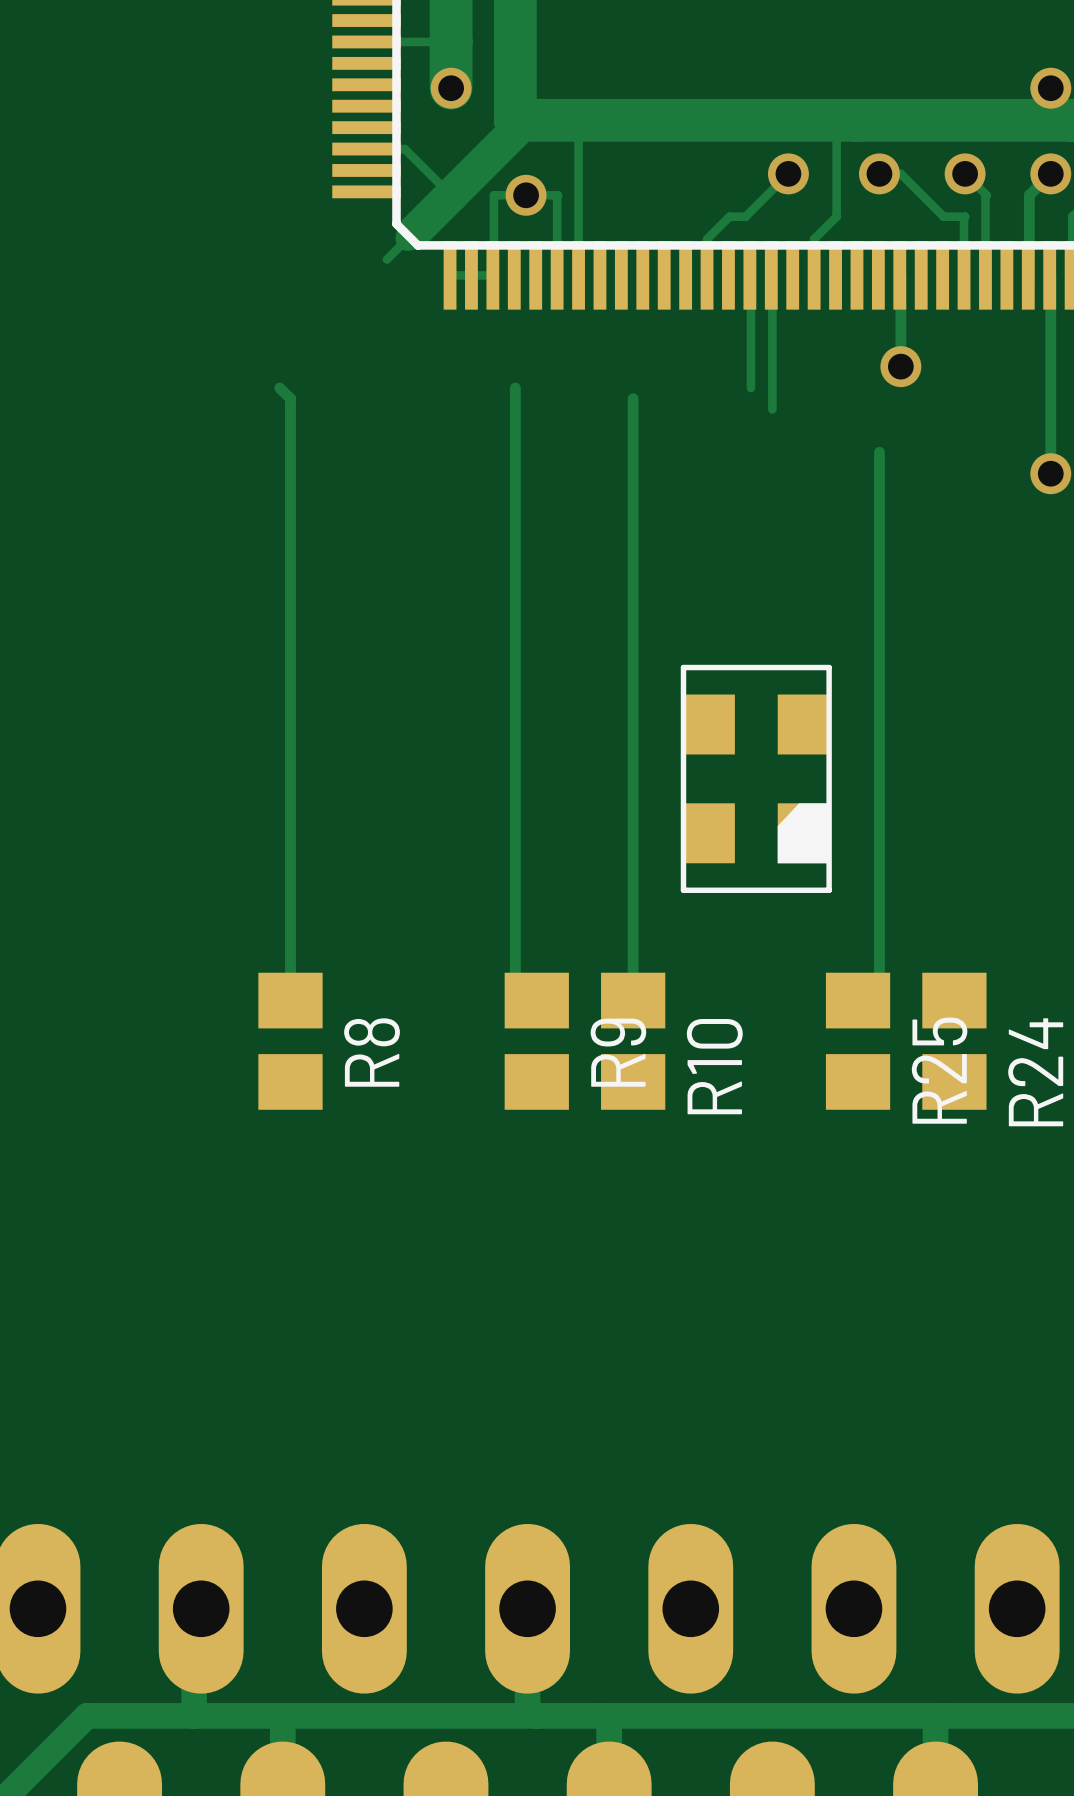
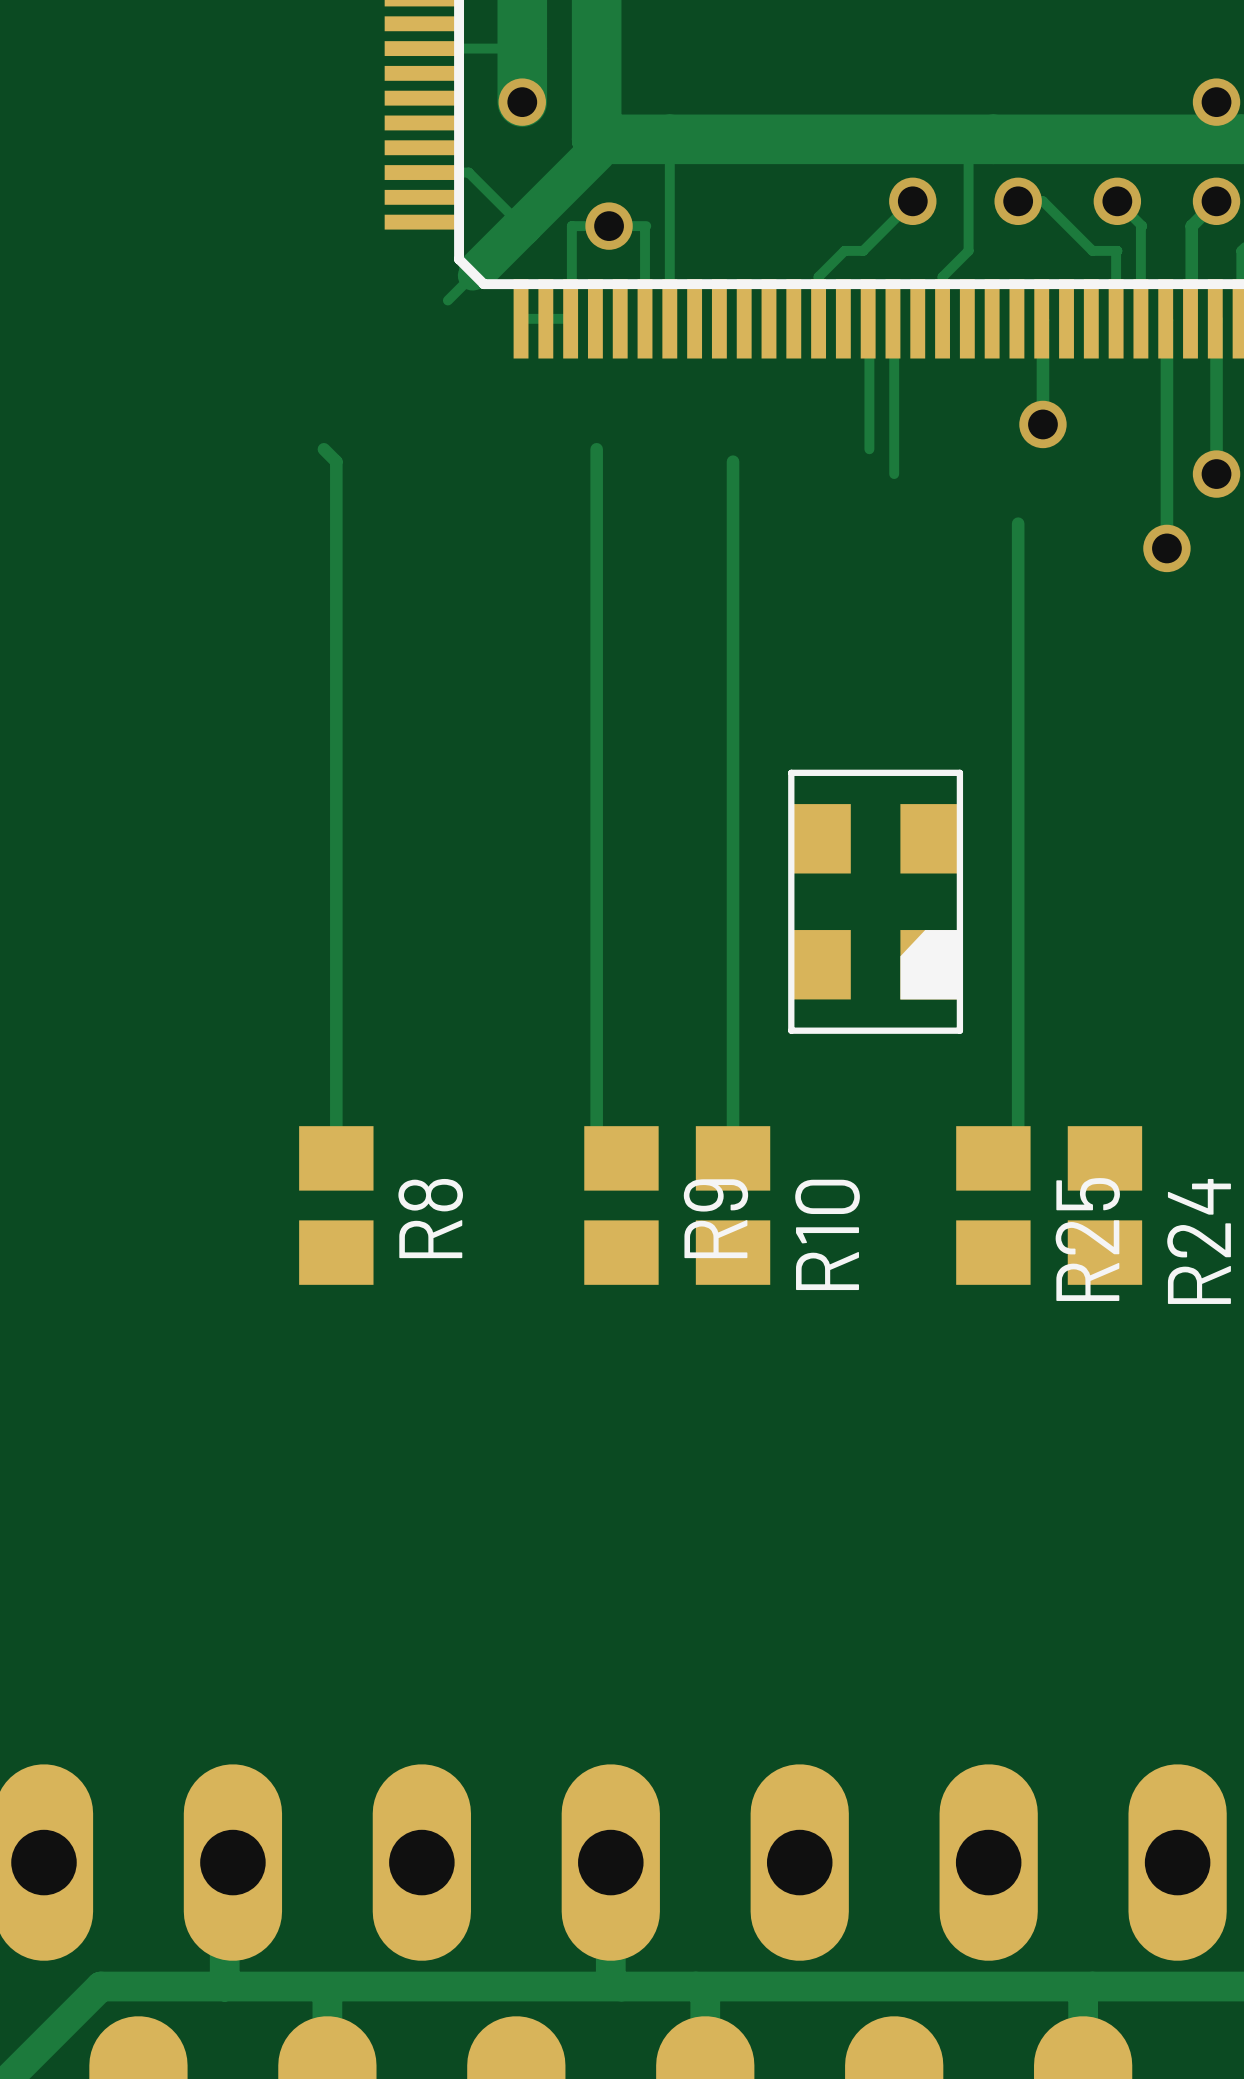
track: none -> (1165, 318) (1166, 548)
track: (1050, 409) (1050, 473) -> none
via: none -> (1216, 474)
via: none -> (1166, 548)
via: (1050, 473) -> none

